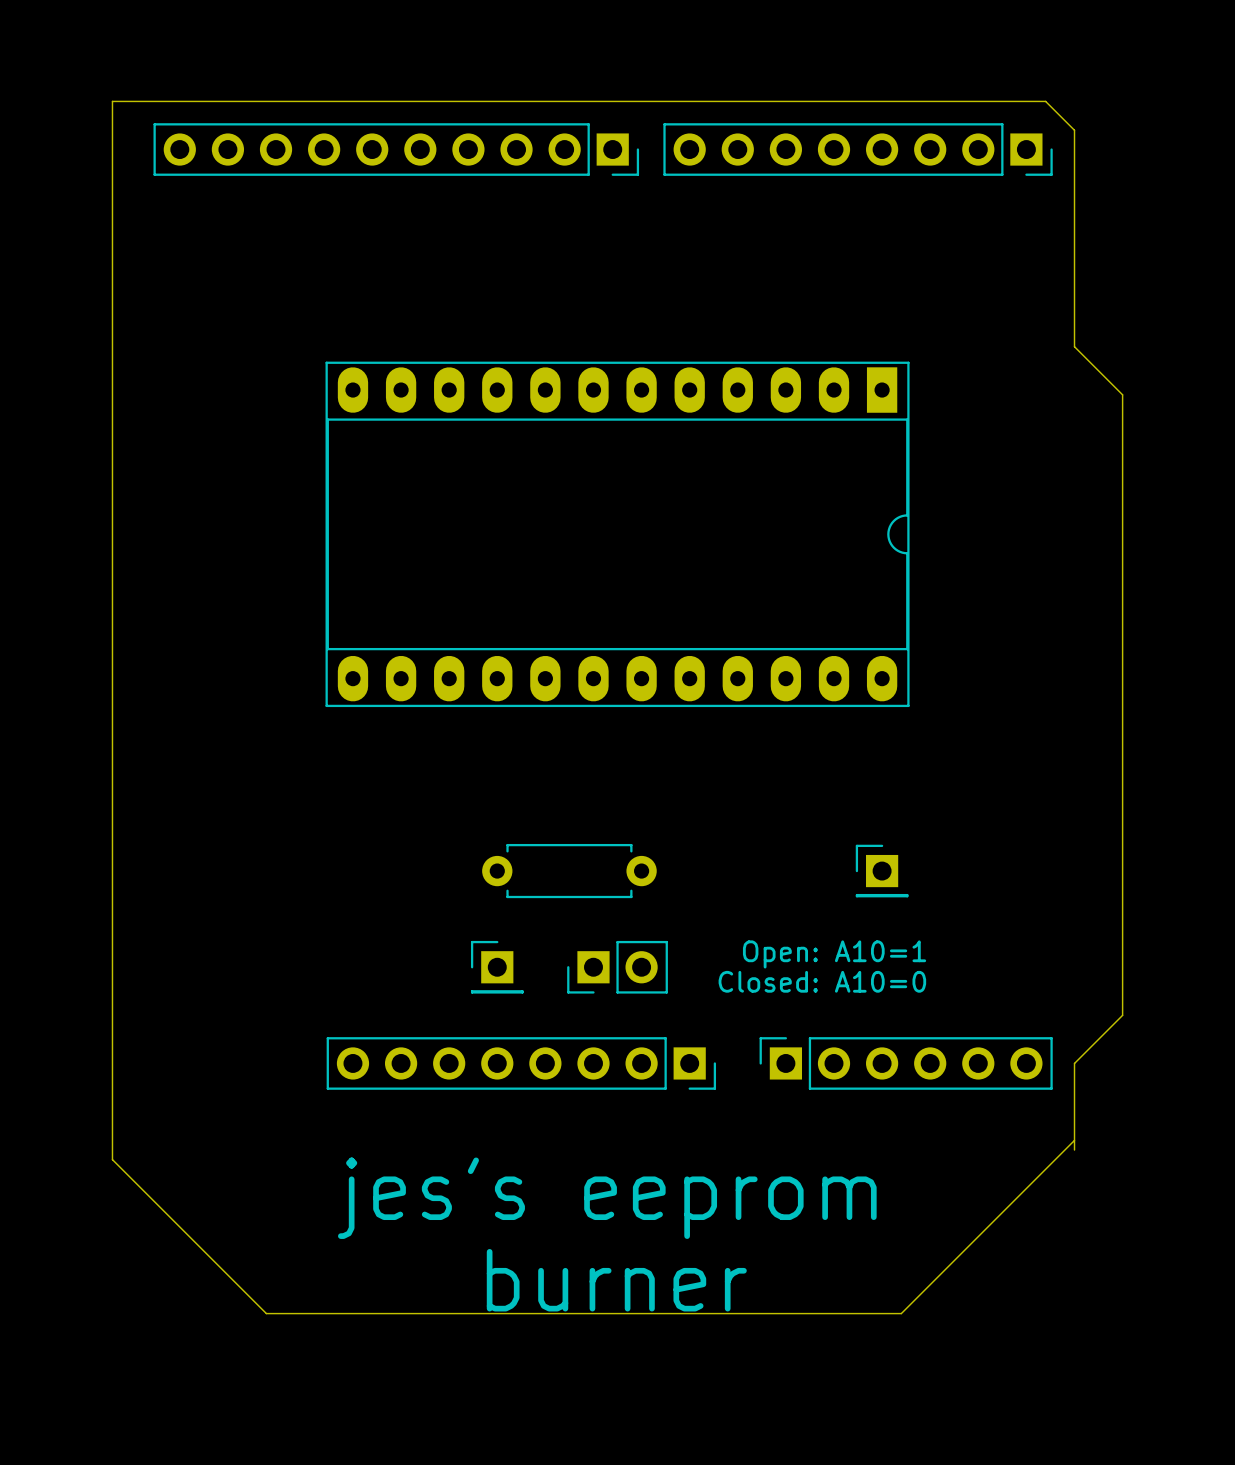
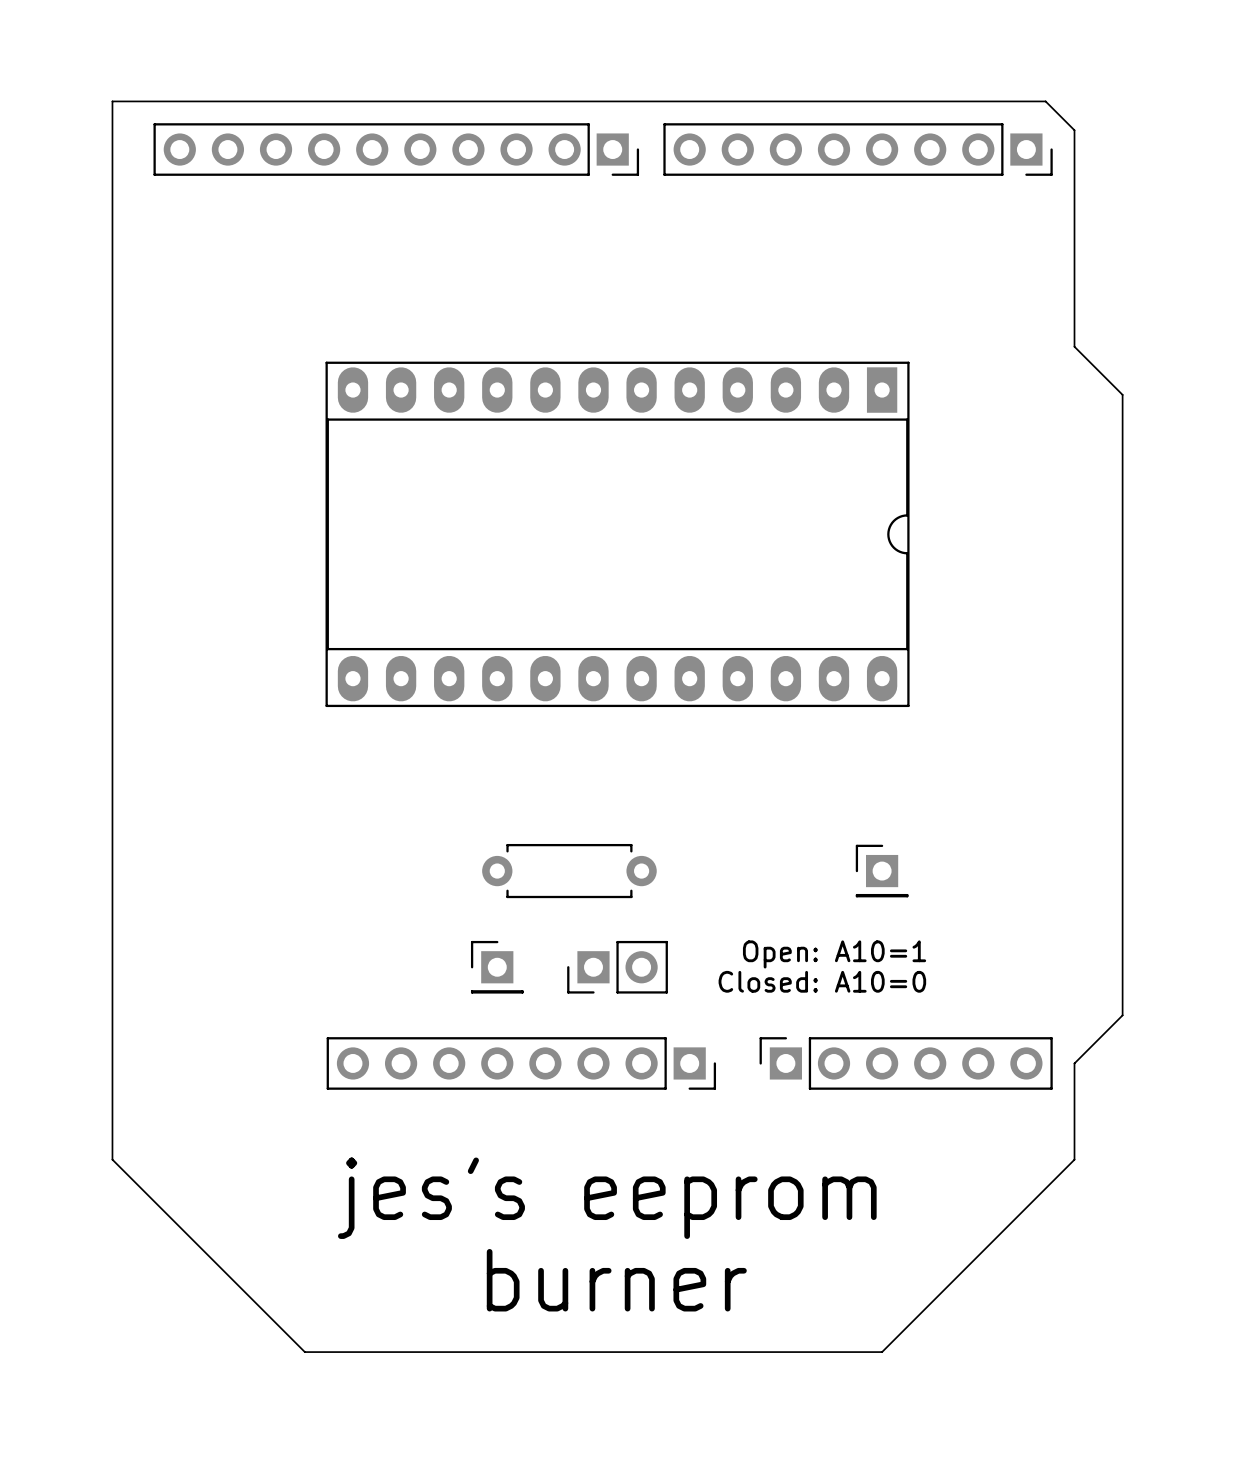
board edge: (1074, 1140) (901, 1313) (266, 1313) -> (1074, 1150) (1074, 1159) (882, 1352) (304, 1352) (266, 1313)

